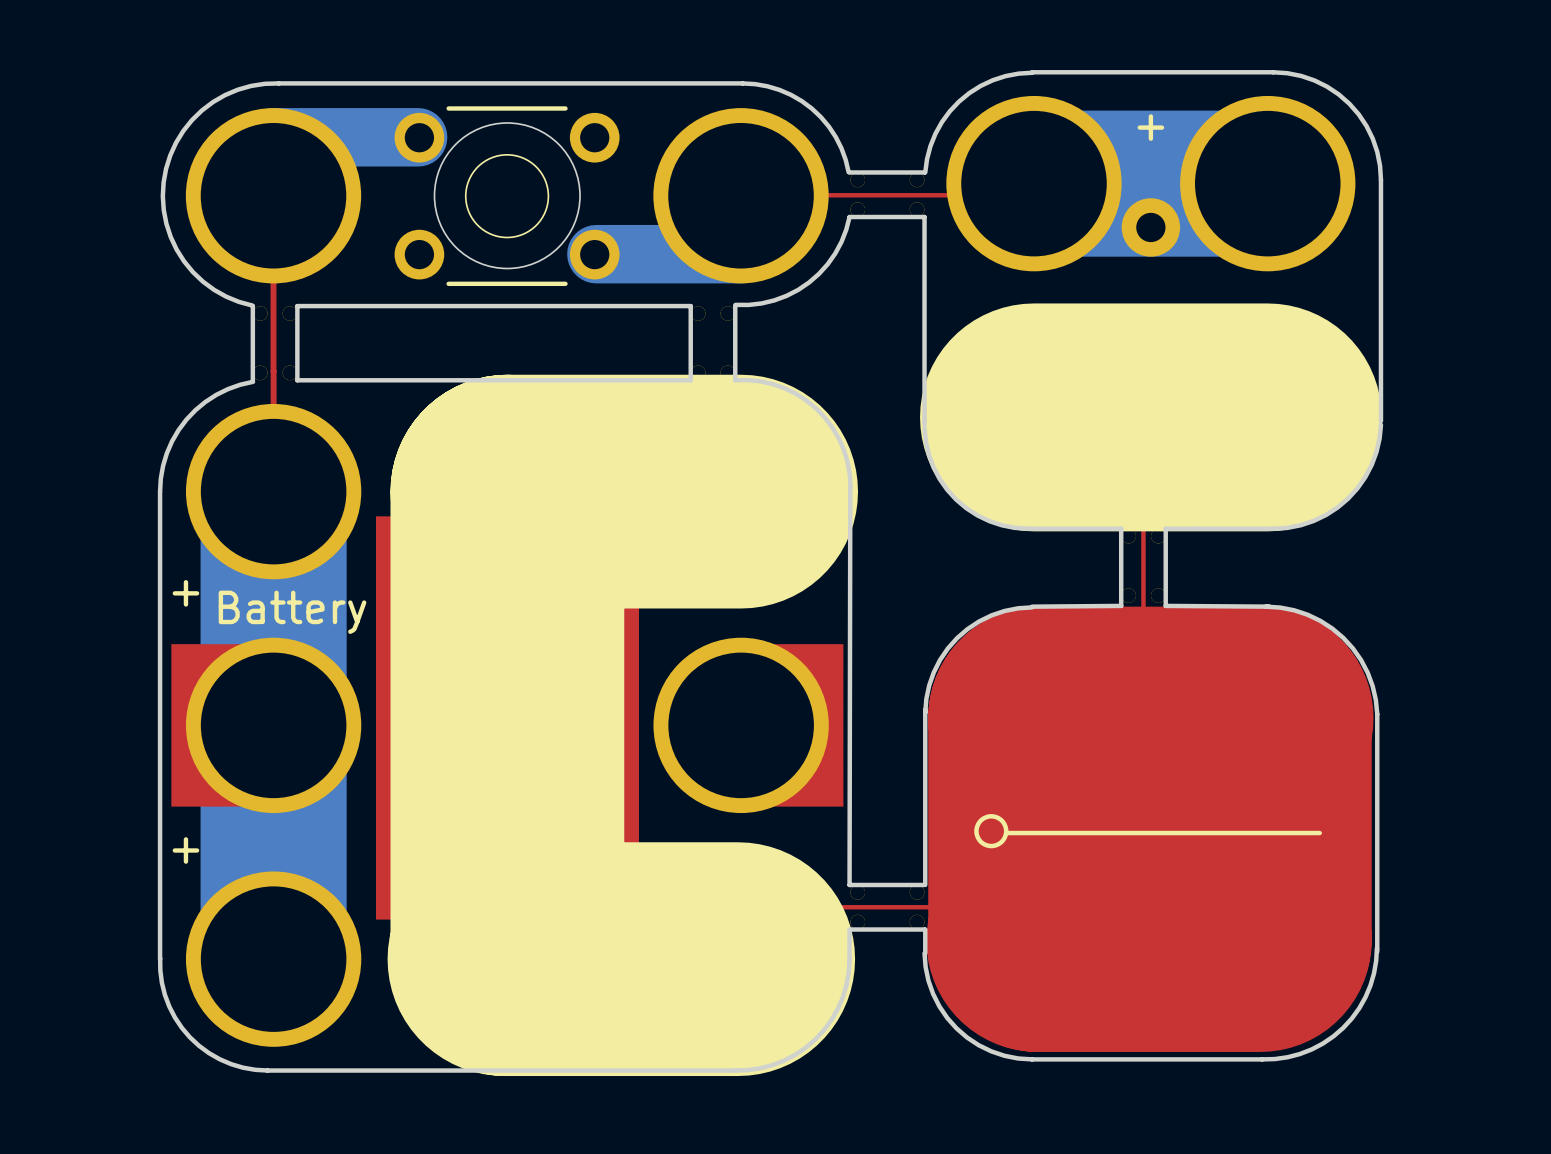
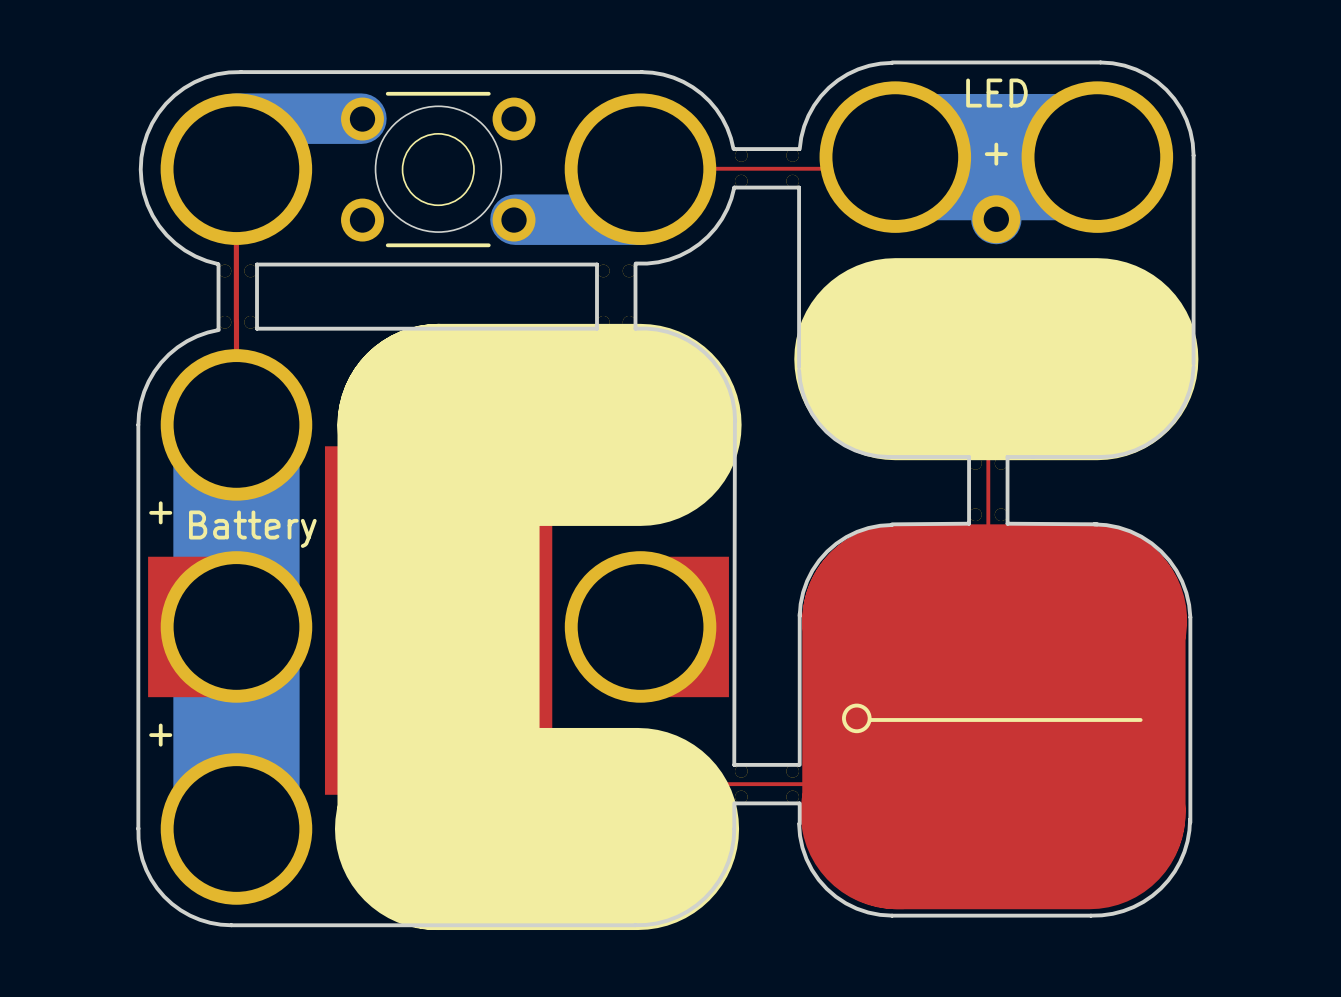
part footprint: [920, 95, 1382, 532] -> [794, 81, 1199, 461]
part value: none -> LED (996, 93)

